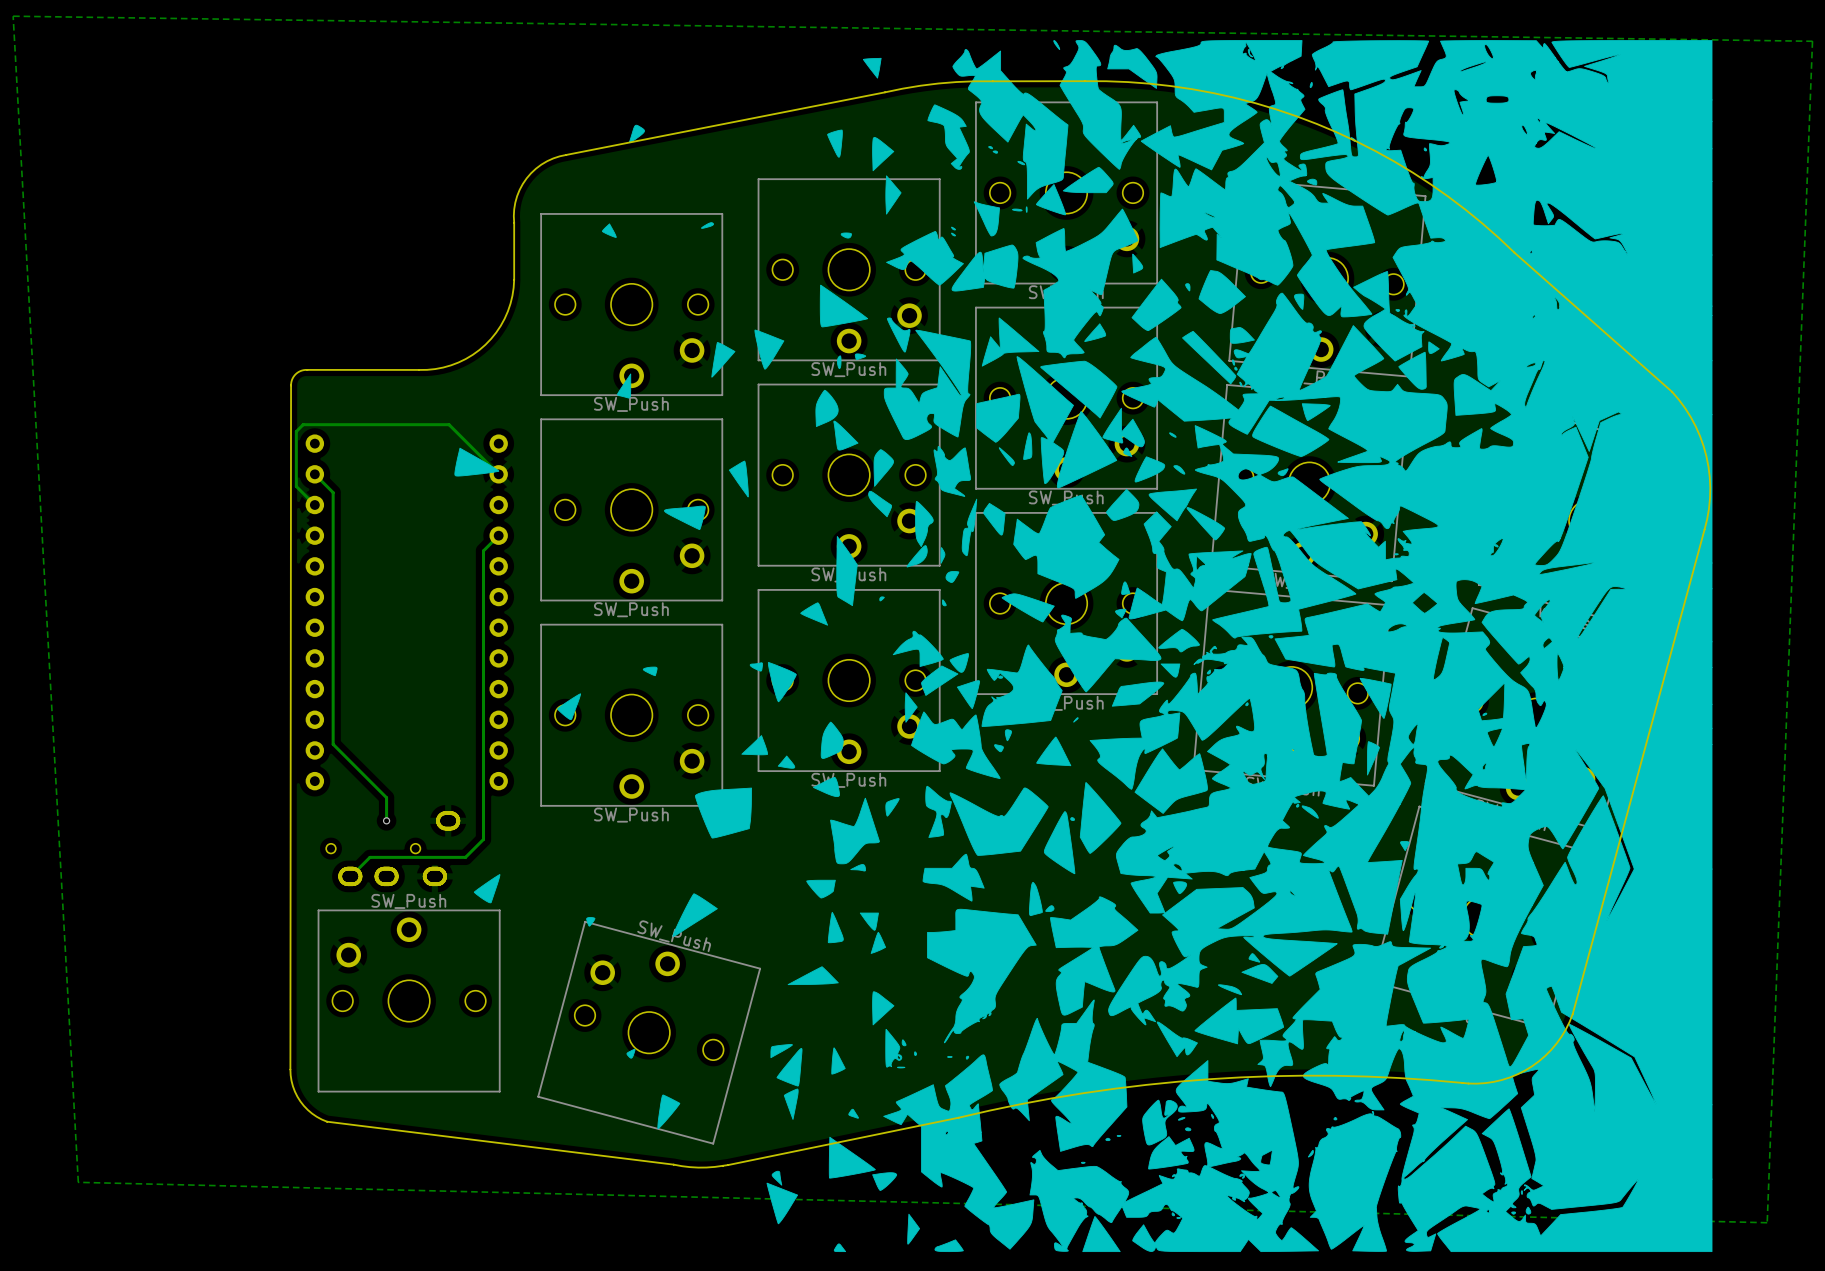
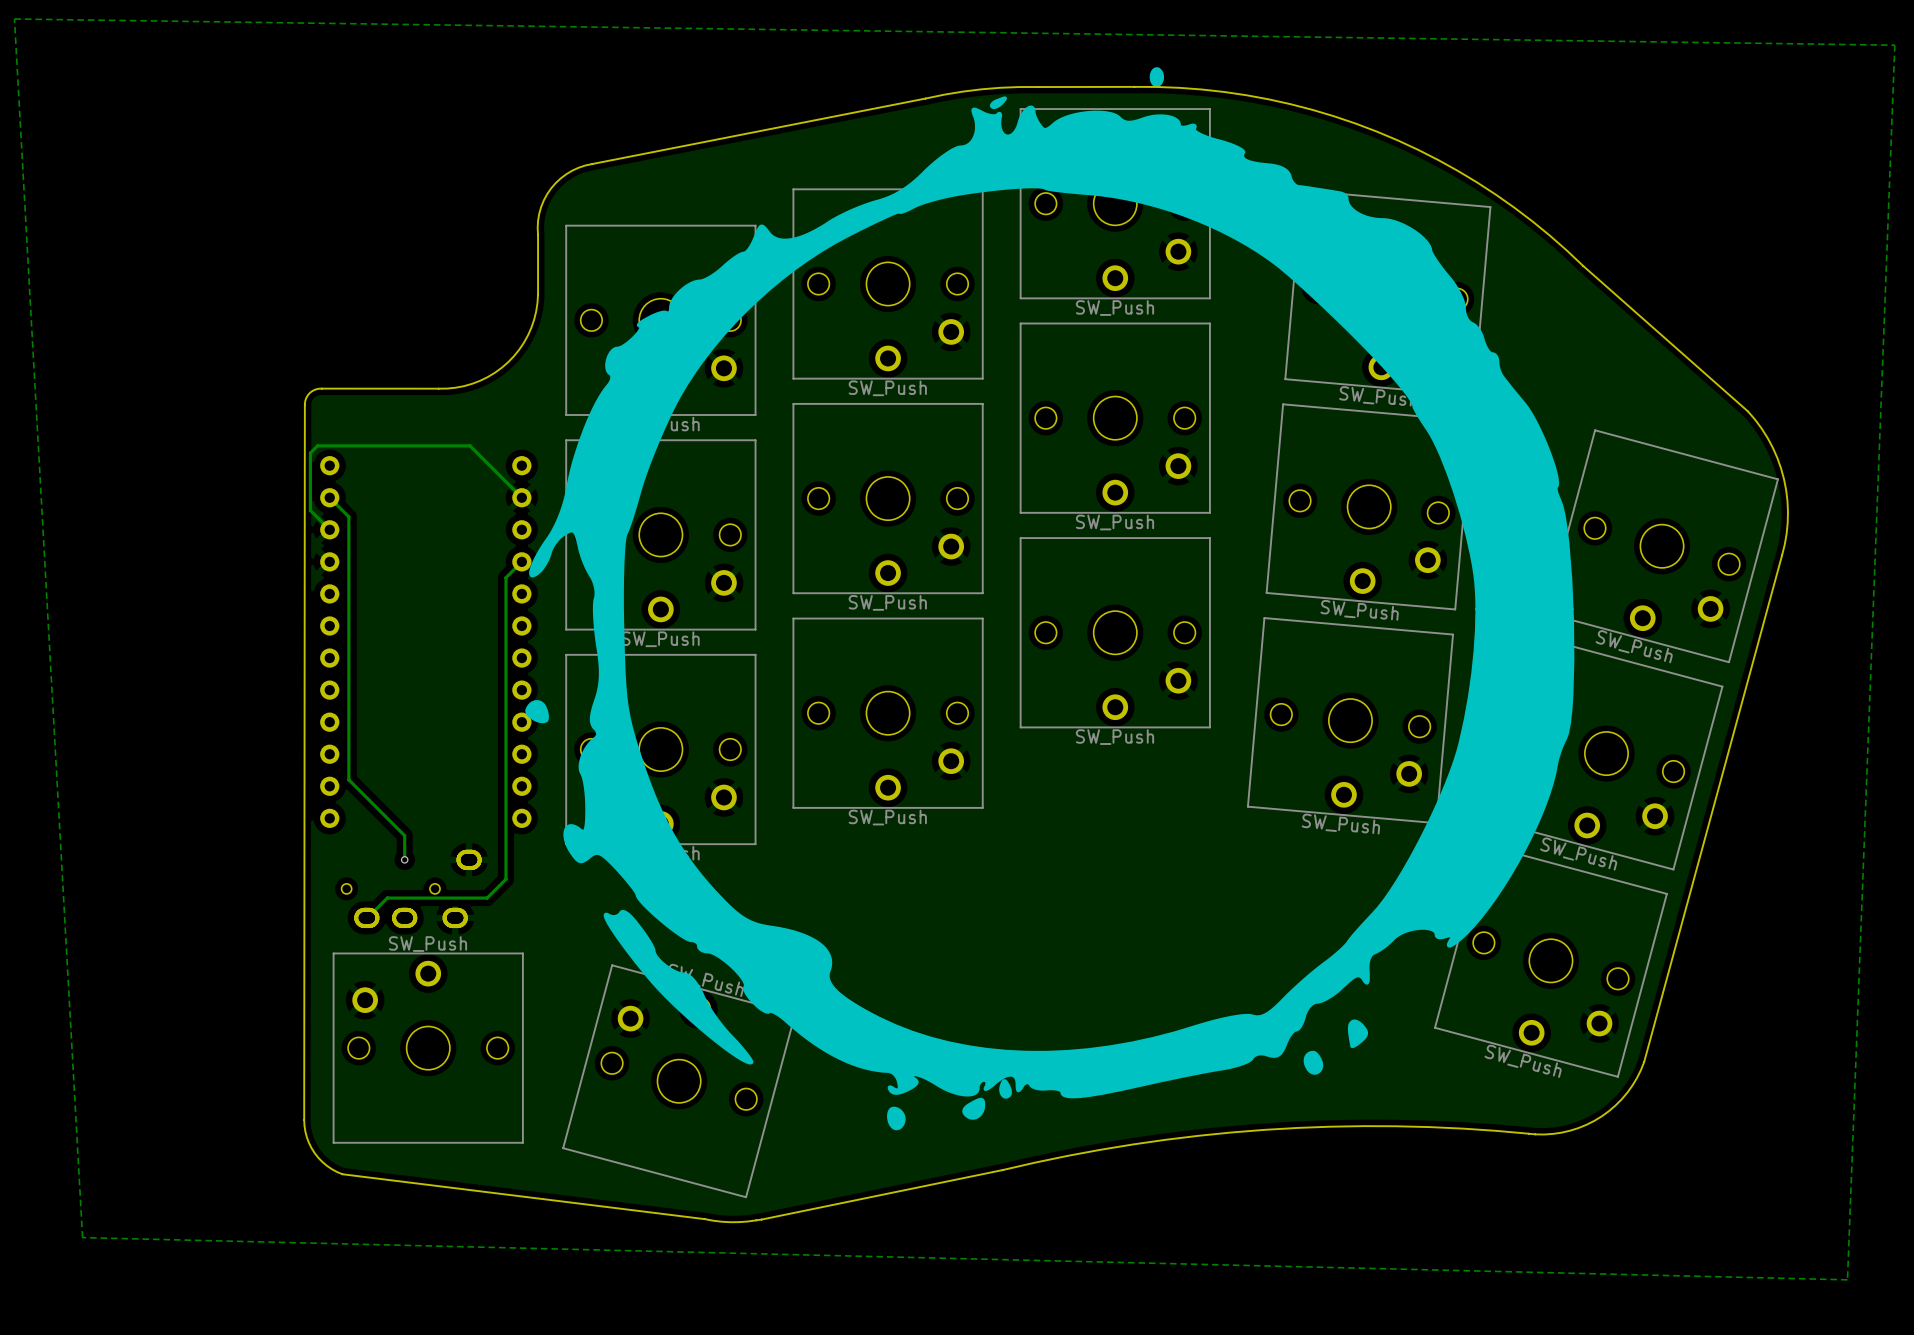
drawing: [828, 40, 1713, 1253] -> none
drawing: [862, 57, 882, 79] -> none
drawing: none -> [1149, 67, 1165, 88]
drawing: none -> [525, 96, 1575, 1131]
drawing: [629, 124, 645, 143] -> none
drawing: [827, 129, 843, 158] -> none
drawing: [872, 137, 902, 215] -> none
drawing: [701, 222, 714, 229] -> none
drawing: [601, 223, 617, 238] -> none
drawing: [840, 232, 852, 239] -> none
drawing: [819, 284, 868, 328] -> none
drawing: [754, 329, 785, 370] -> none
drawing: [711, 342, 736, 378] -> none
drawing: [837, 353, 867, 369] -> none
drawing: [616, 373, 632, 399] -> none
drawing: [815, 389, 859, 451] -> none
drawing: [454, 447, 500, 477] -> none
drawing: [728, 460, 749, 498] -> none
drawing: [664, 505, 706, 531] -> none
drawing: [800, 536, 858, 626] -> none
drawing: [879, 596, 885, 602] -> none
drawing: [942, 599, 947, 607] -> none
drawing: [749, 662, 797, 703] -> none
drawing: [642, 666, 658, 677] -> none
drawing: [557, 693, 581, 721] -> none
drawing: [820, 721, 844, 759] -> none
drawing: [741, 735, 796, 769] -> none
drawing: [813, 776, 900, 872] -> none
drawing: [695, 787, 752, 839] -> none
drawing: [473, 874, 501, 904] -> none
drawing: [806, 879, 844, 944] -> none
drawing: [672, 893, 718, 937] -> none
drawing: [859, 912, 887, 954] -> none
drawing: [586, 917, 596, 927] -> none
drawing: [787, 966, 839, 986] -> none
drawing: [770, 1044, 803, 1120] -> none
drawing: [831, 1047, 846, 1075] -> none
drawing: [626, 1048, 636, 1059] -> none
drawing: [657, 1094, 681, 1130] -> none
drawing: [848, 1108, 859, 1119] -> none
drawing: [766, 1170, 799, 1225] -> none
drawing: [833, 1243, 847, 1253] -> none

